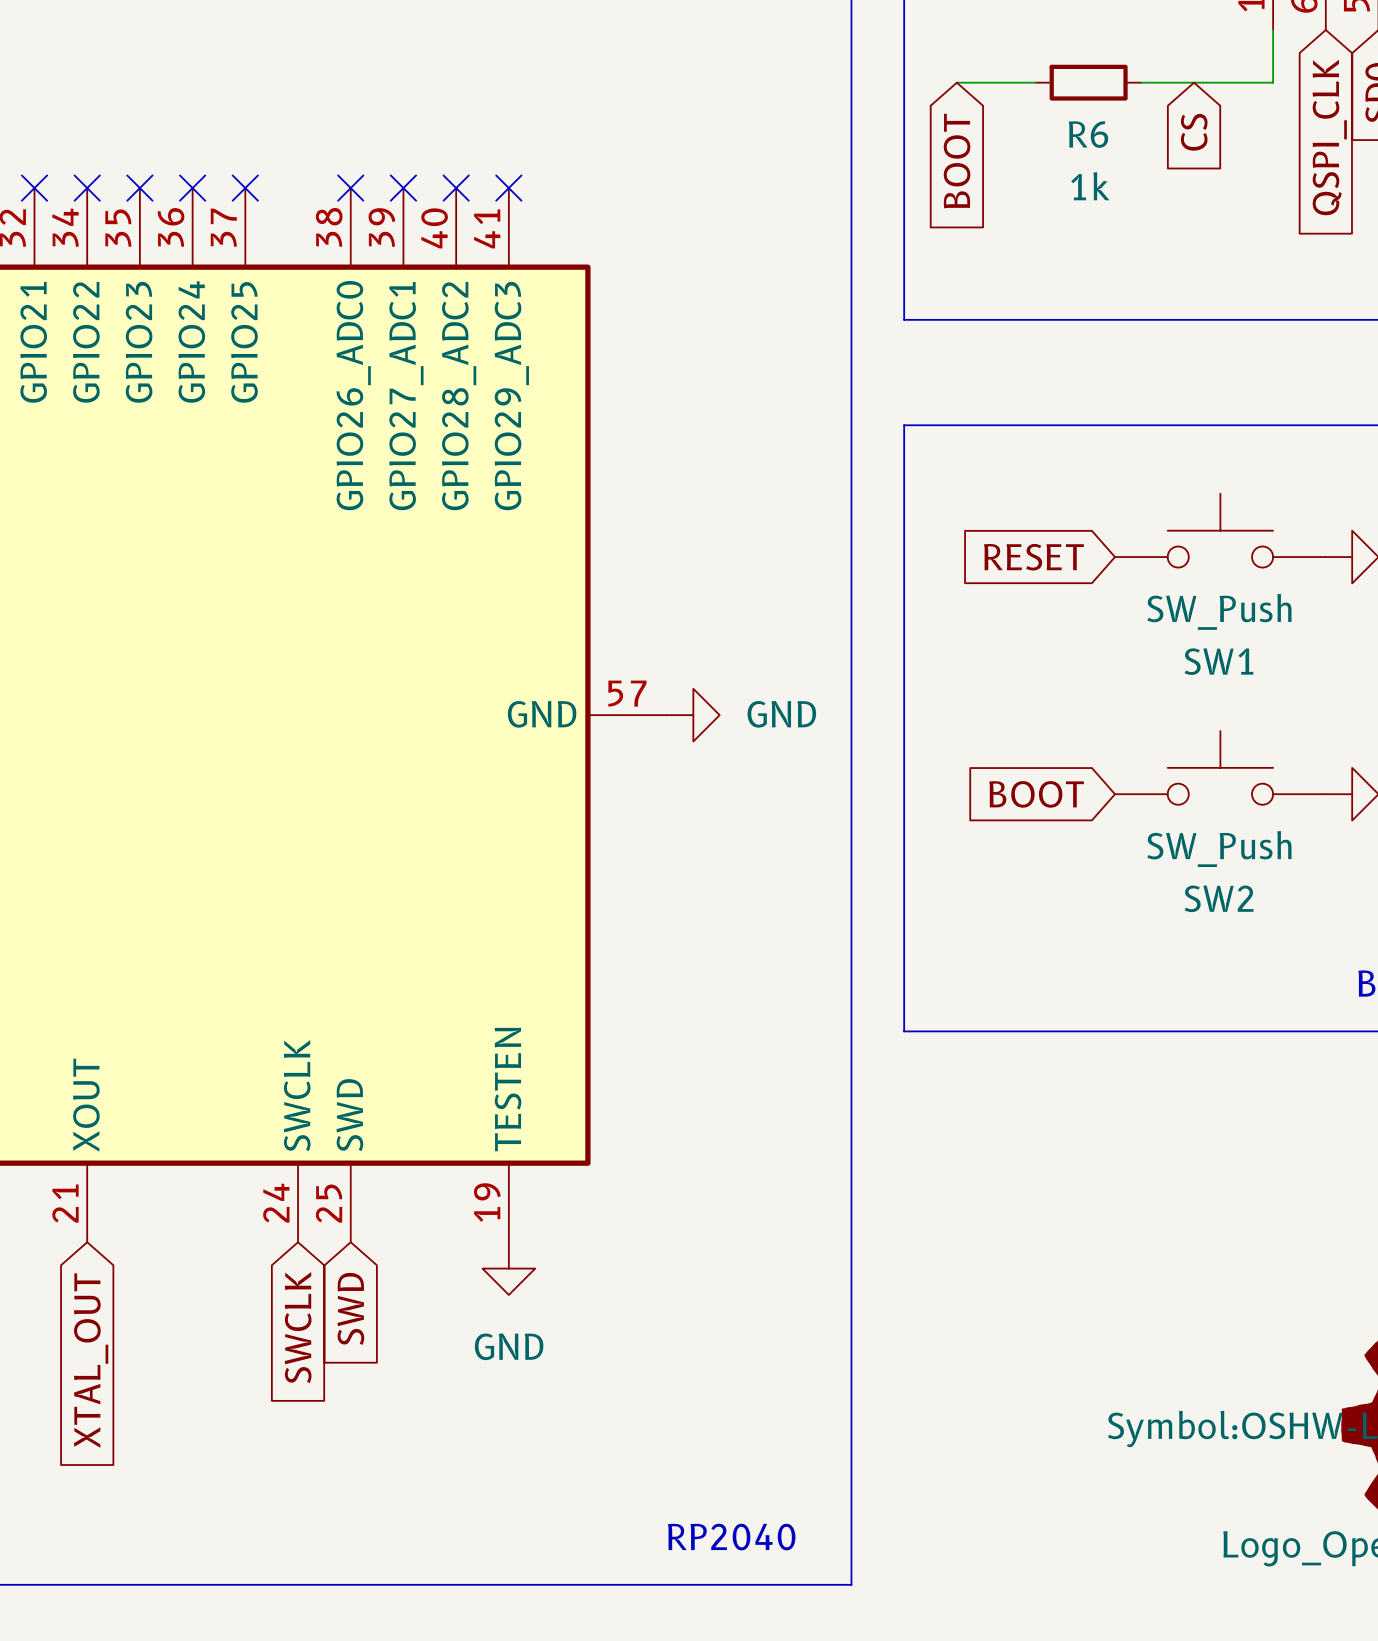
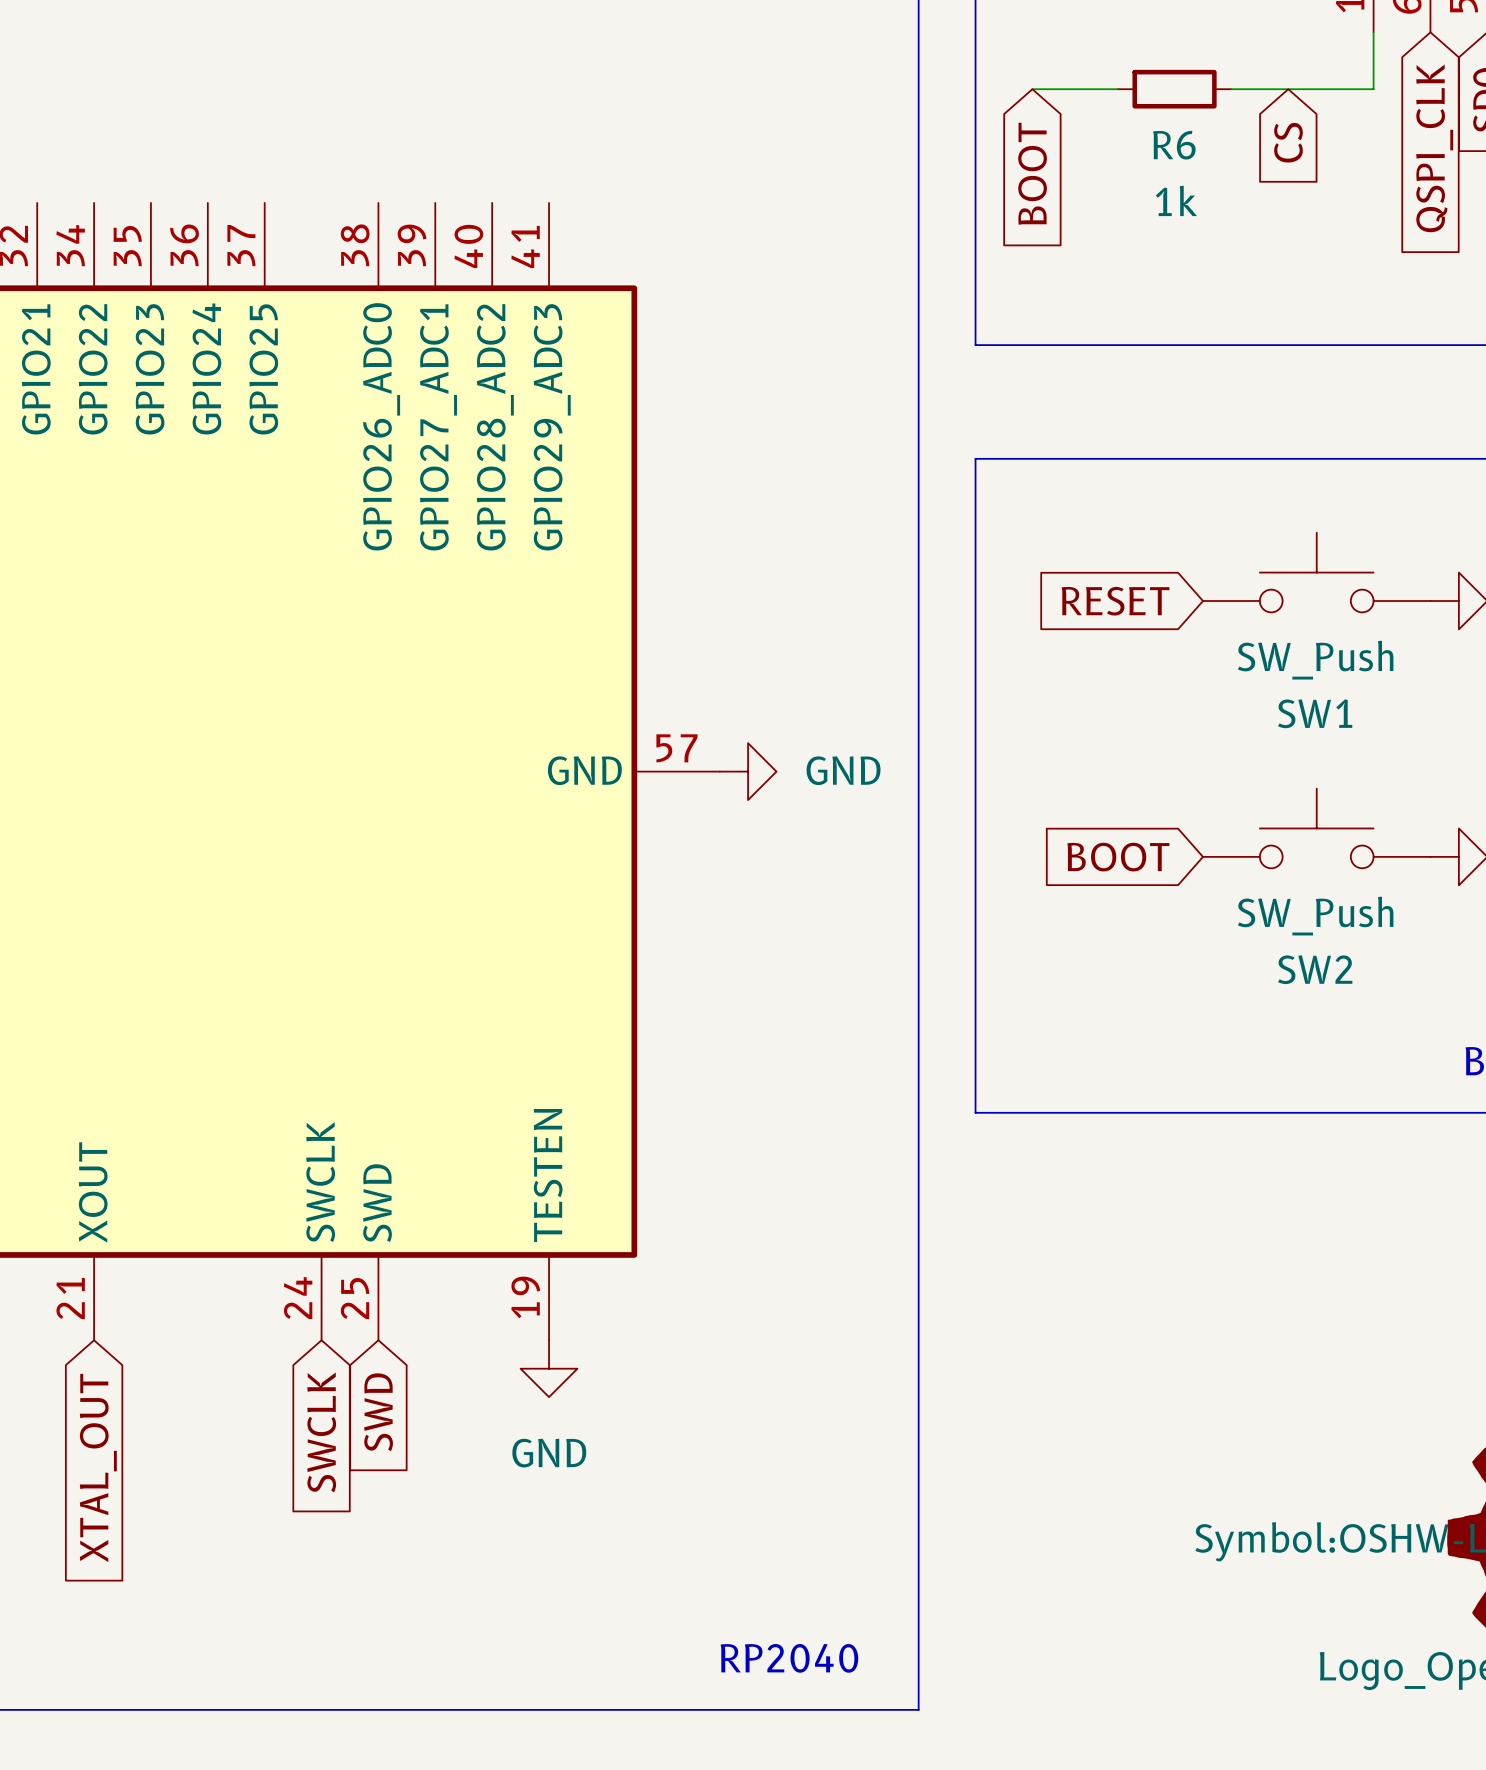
no-connect mark: (34, 188) -> none
no-connect mark: (87, 188) -> none
no-connect mark: (139, 188) -> none
no-connect mark: (192, 188) -> none
no-connect mark: (245, 188) -> none
no-connect mark: (350, 188) -> none
no-connect mark: (403, 188) -> none
no-connect mark: (456, 188) -> none
no-connect mark: (508, 188) -> none

